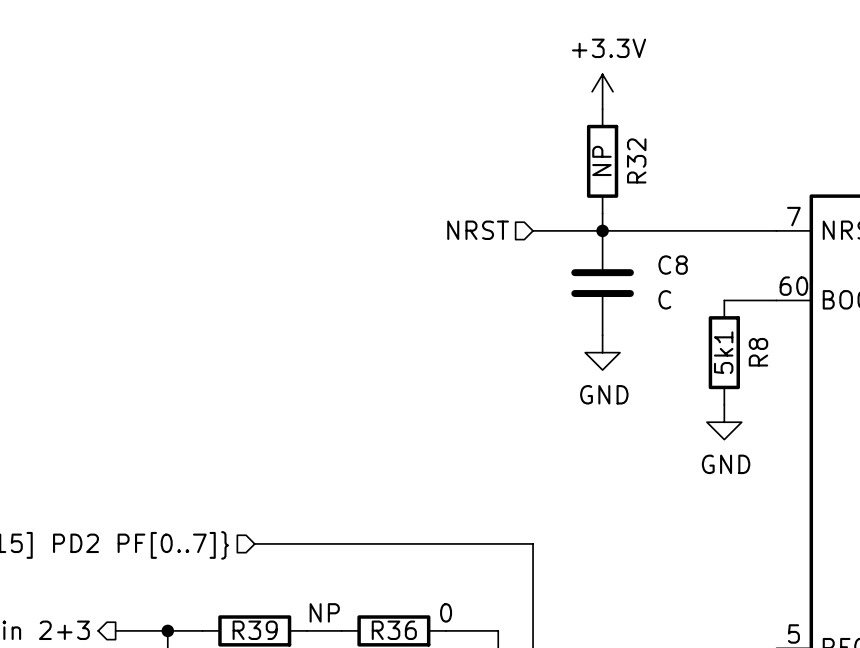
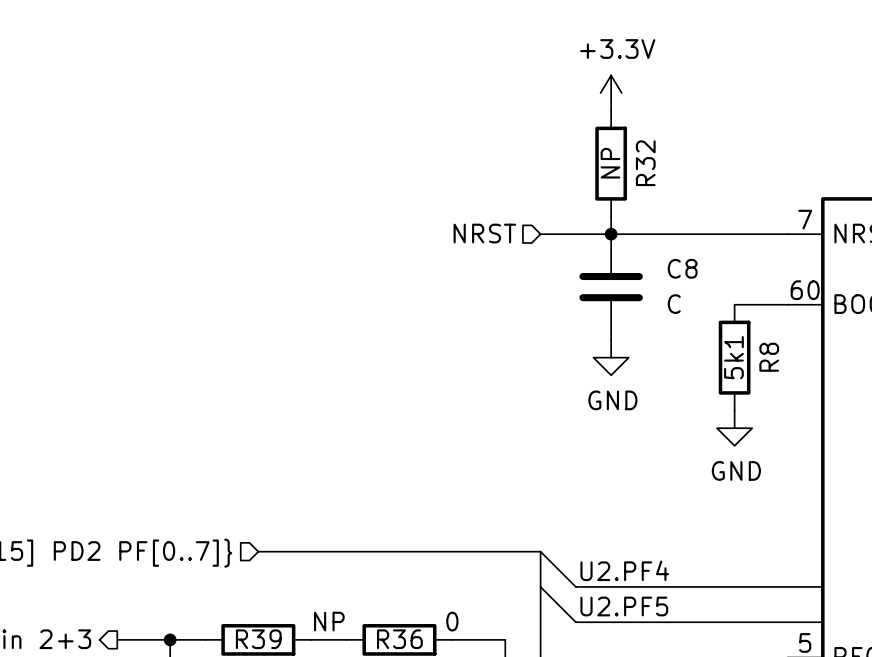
wire: none -> (540, 551) (575, 586) (822, 586)
label: none -> U2.PF4 (624, 570)
wire: none -> (540, 586) (575, 622) (822, 622)
label: none -> U2.PF5 (624, 606)

